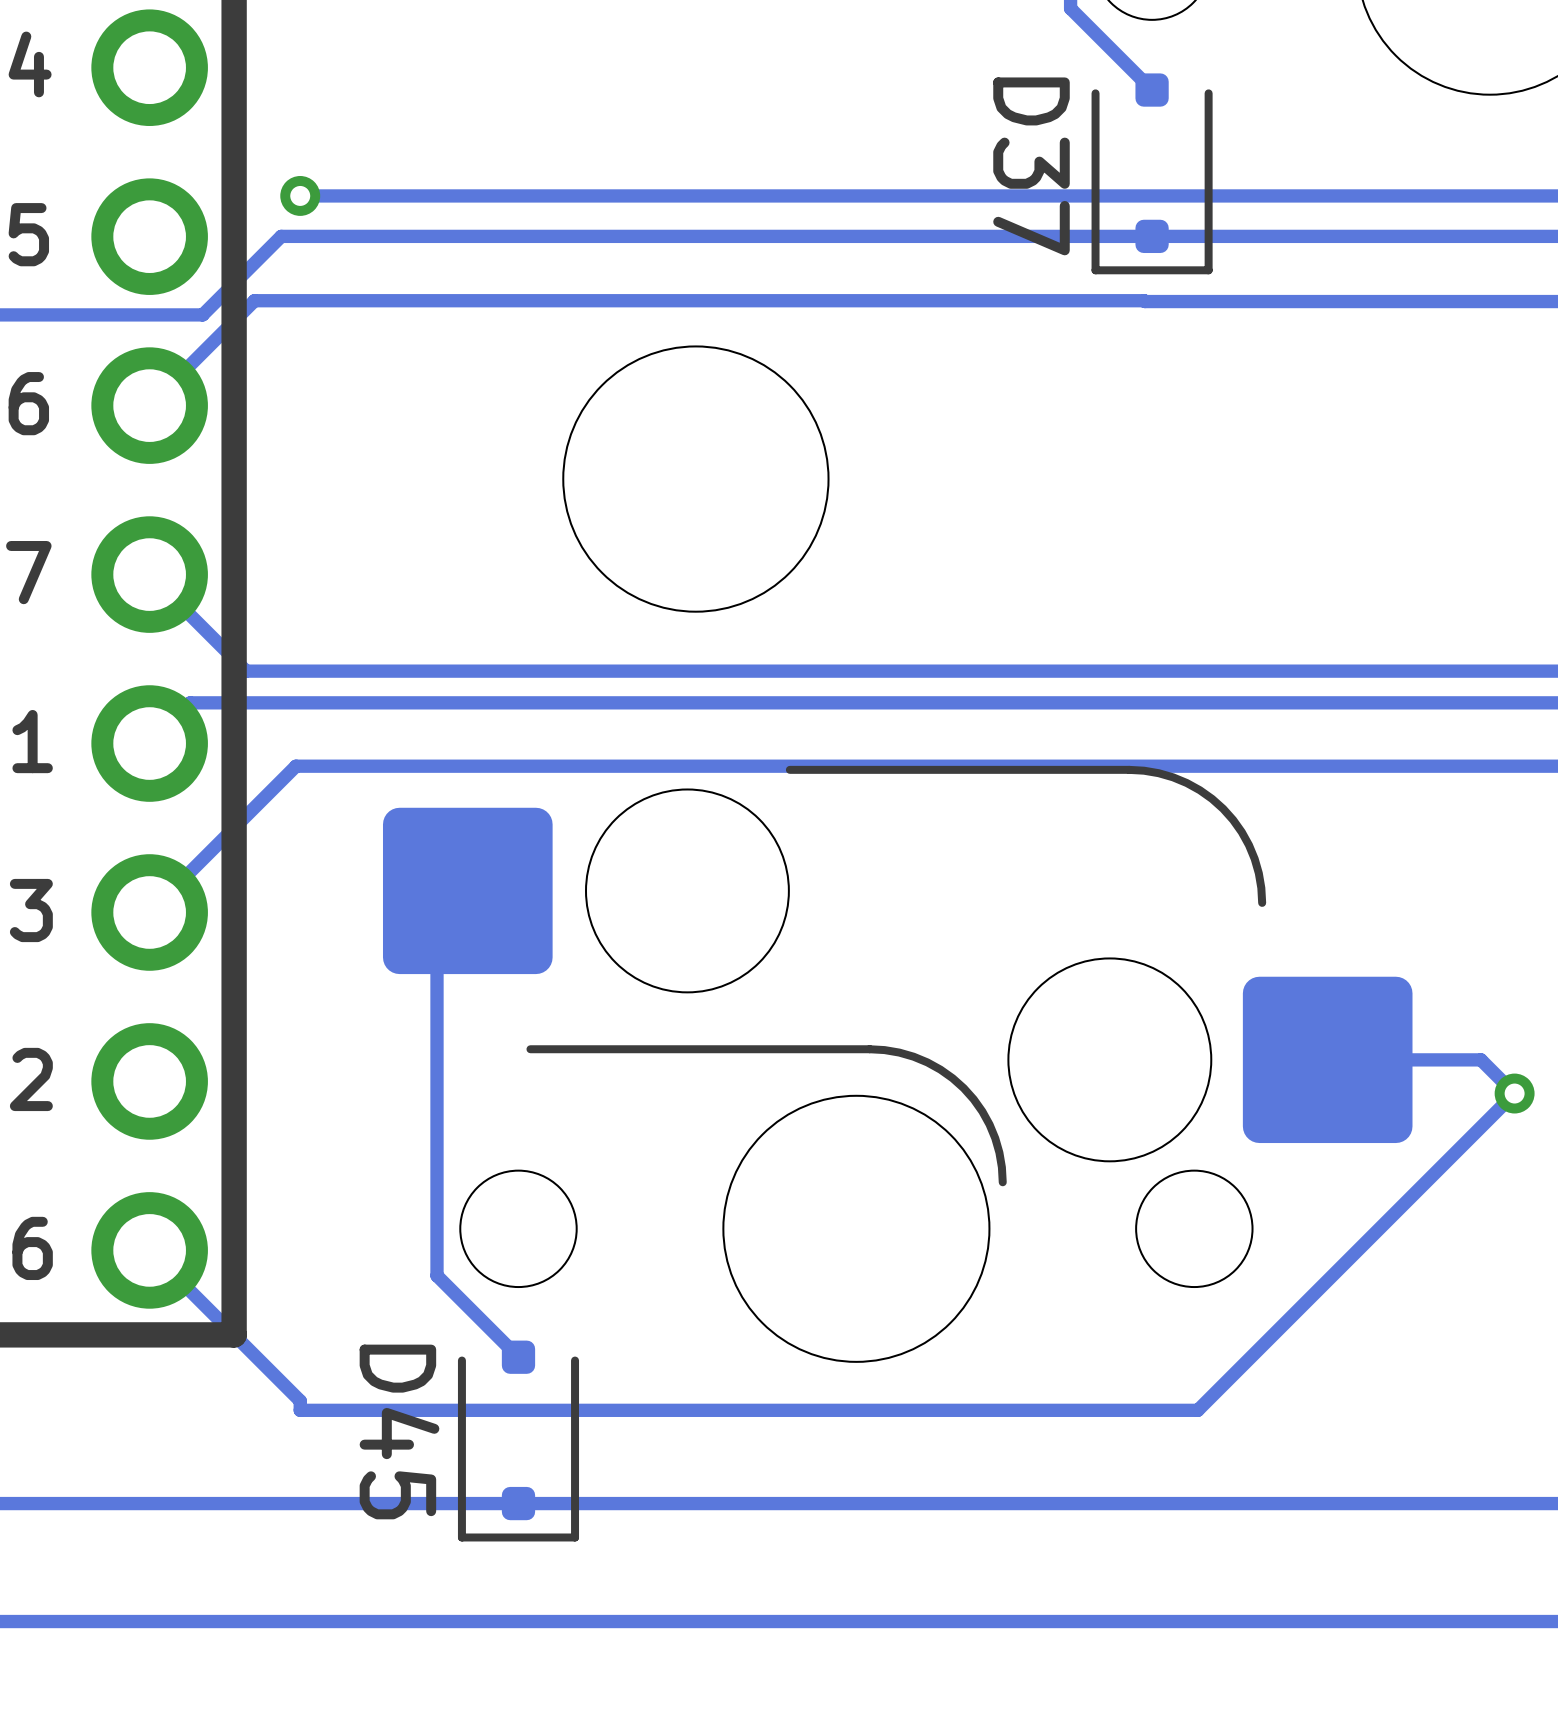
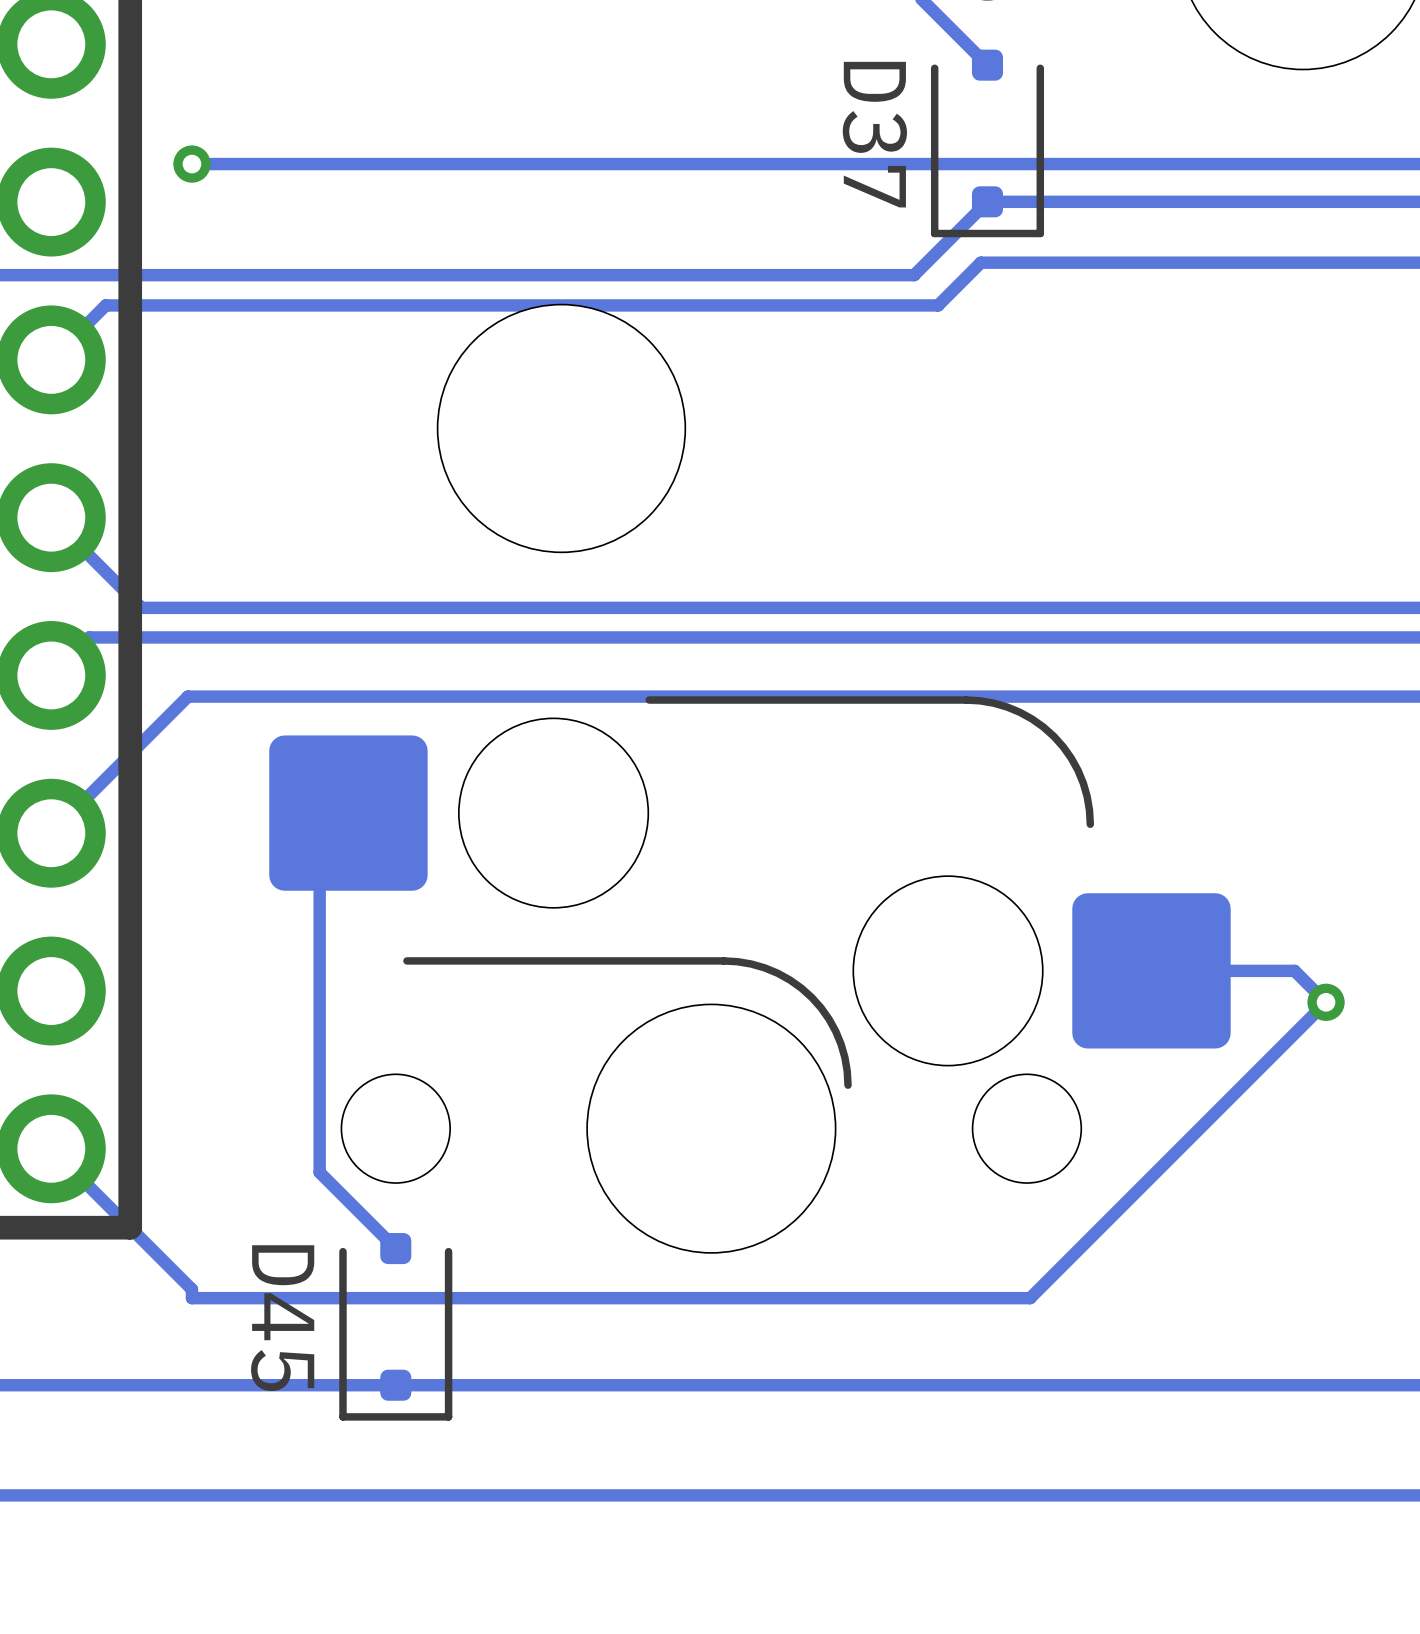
track: (1152, 236) (281, 236) (202, 314) -> (987, 201) (914, 275) (100, 275)
track: (1144, 300) (254, 300) (207, 347) -> (980, 262) (938, 305) (105, 305)

